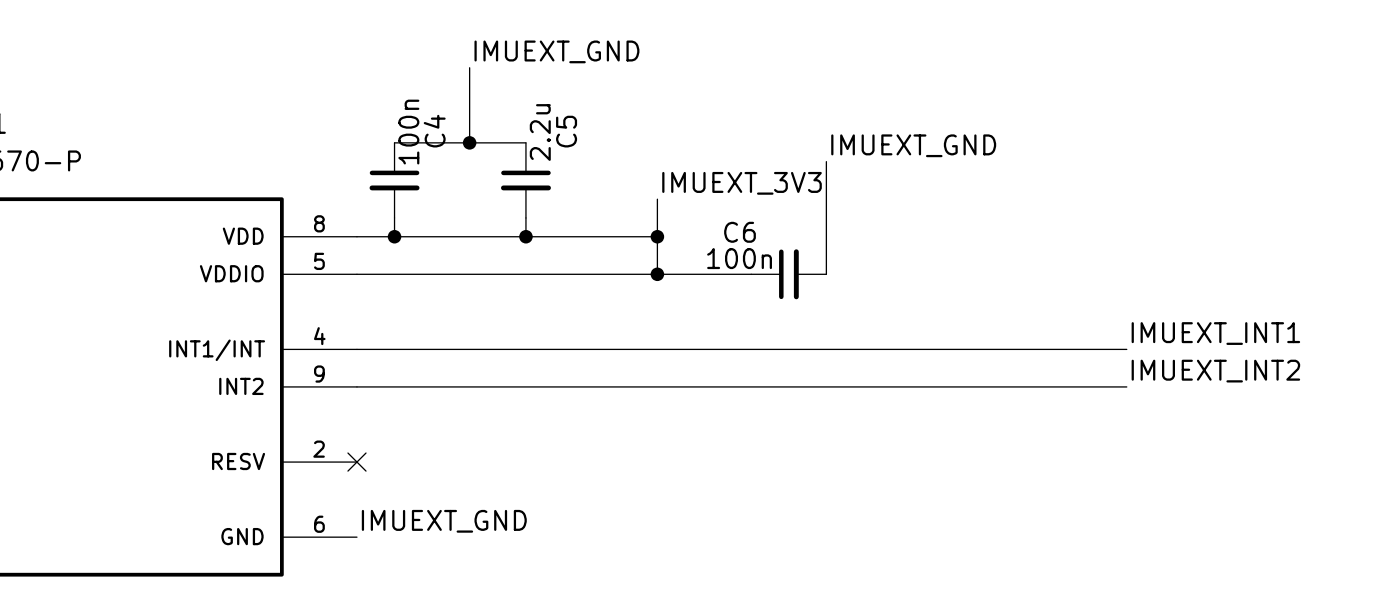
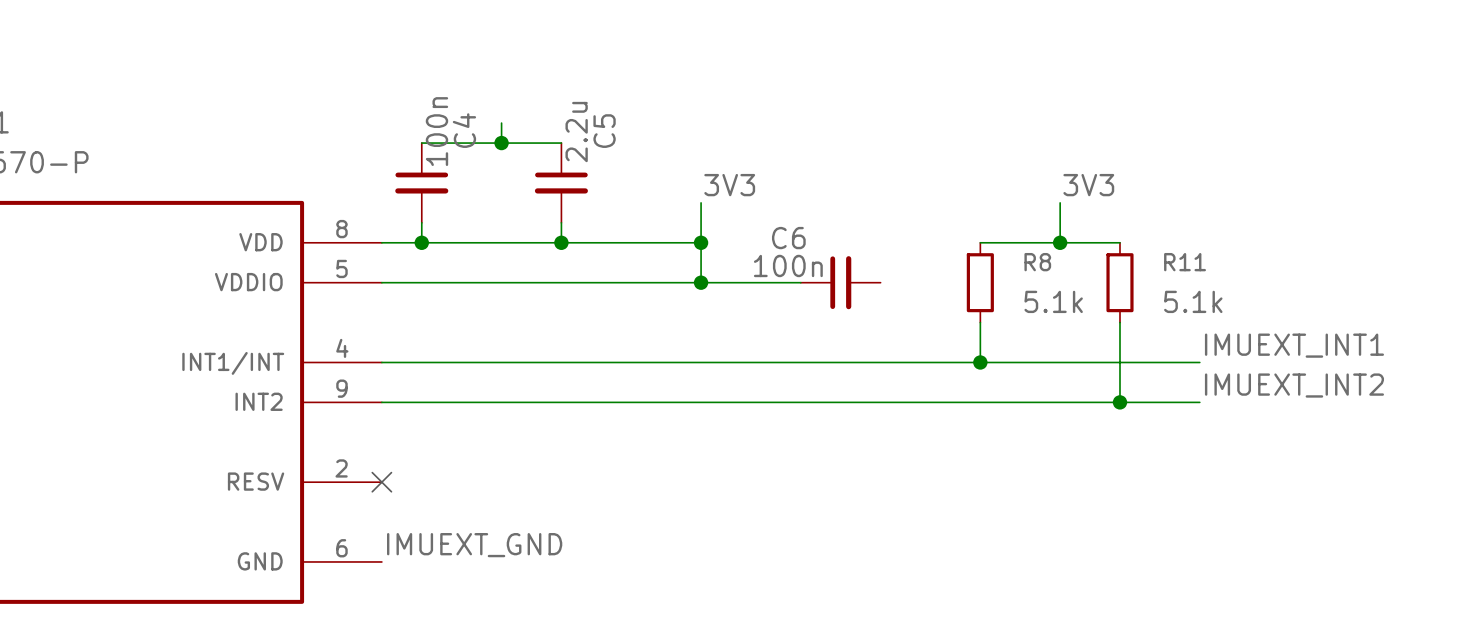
label: IMUEXT_GND (556, 51) -> none
wire: (469, 67) (469, 124) -> none
label: IMUEXT_GND (913, 145) -> none
wire: (826, 161) (826, 274) -> none
label: none -> 3V3 (1088, 185)
label: IMUEXT_3V3 (742, 183) -> 3V3 (729, 185)
wire: none -> (1060, 202) (1060, 242)
wire: none -> (980, 242) (1119, 242)
junction: none -> (1060, 242)
R8: none -> 5.1k (980, 282)
R11: none -> 5.1k (1119, 282)
wire: none -> (980, 322) (980, 362)
wire: none -> (1119, 322) (1119, 402)
junction: none -> (980, 362)
junction: none -> (1119, 402)

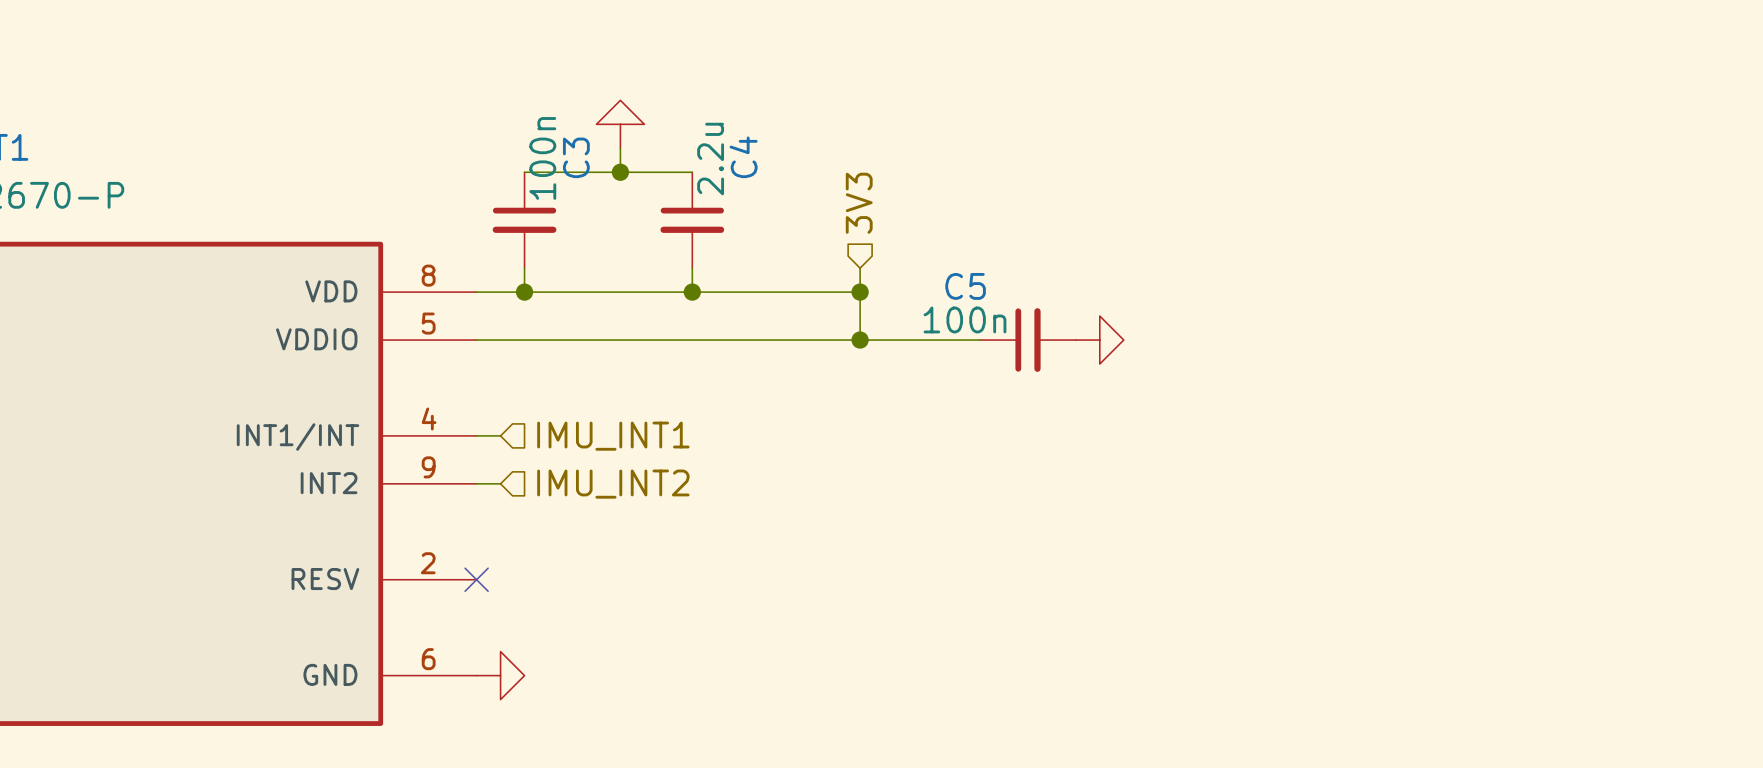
power symbol: none -> (620, 124)
C4 name: C4 (464, 130) -> C3 (576, 157)
C5 name: C5 (604, 131) -> C4 (743, 157)
hierarchical label: none -> 3V3 (859, 203)
label: 3V3 (729, 185) -> none
label: 3V3 (1088, 185) -> none
wire: (701, 202) (701, 222) -> none
wire: (1060, 202) (1060, 242) -> none
C6 name: C6 (788, 238) -> C5 (965, 286)
wire: (980, 242) (1119, 242) -> none
junction: (1060, 242) -> none
power symbol: none -> (1099, 340)
R8: 5.1k (980, 282) -> none
R11: 5.1k (1119, 282) -> none
wire: (980, 322) (980, 362) -> none
wire: (1119, 322) (1119, 402) -> none
label: IMUEXT_INT1 (1294, 345) -> none
wire: (401, 362) (1199, 362) -> none
hierarchical label: none -> IMU_INT1 (613, 436)
junction: (980, 362) -> none
label: IMUEXT_INT2 (1294, 385) -> none
wire: (401, 402) (1199, 402) -> none
hierarchical label: none -> IMU_INT2 (613, 484)
junction: (1119, 402) -> none
label: IMUEXT_GND (474, 545) -> none
power symbol: none -> (500, 675)

